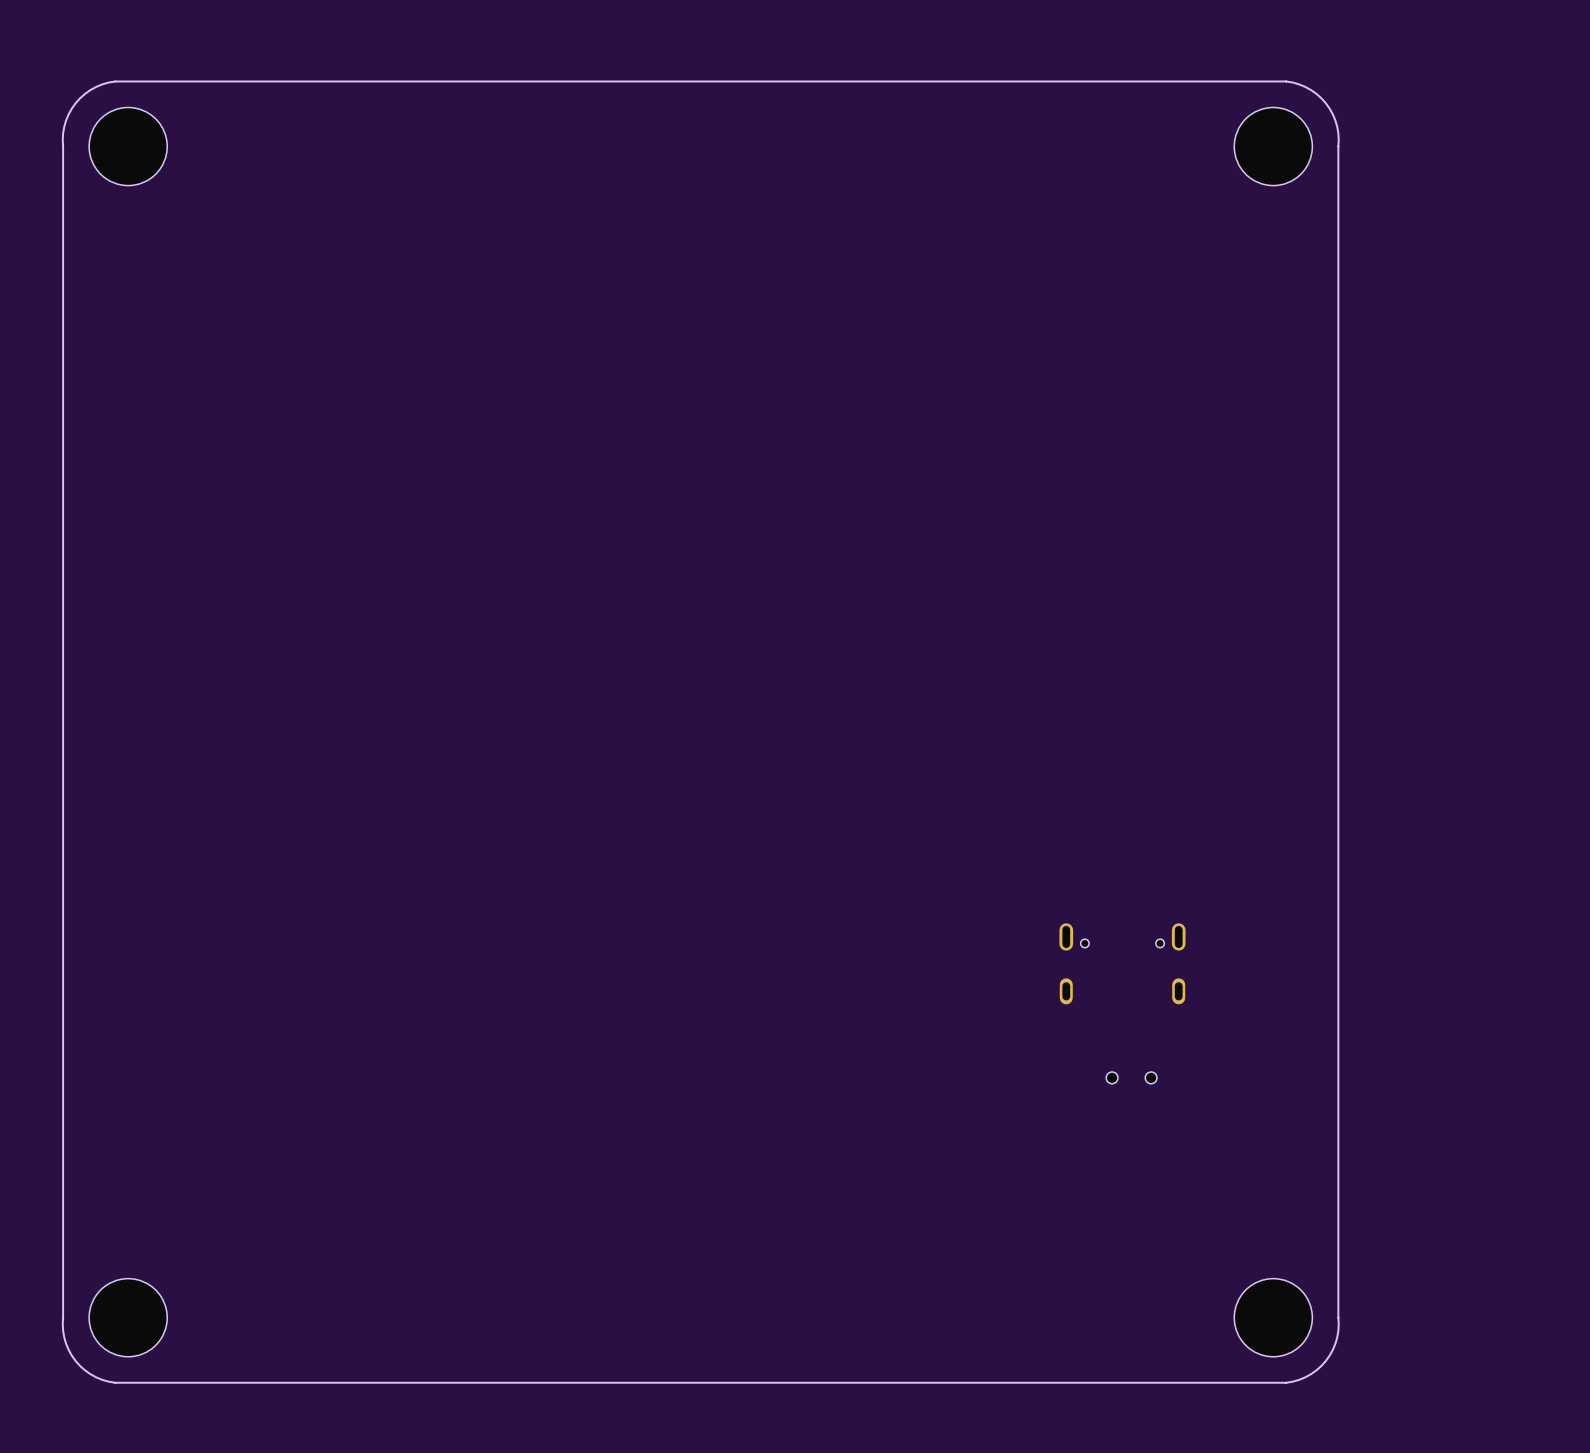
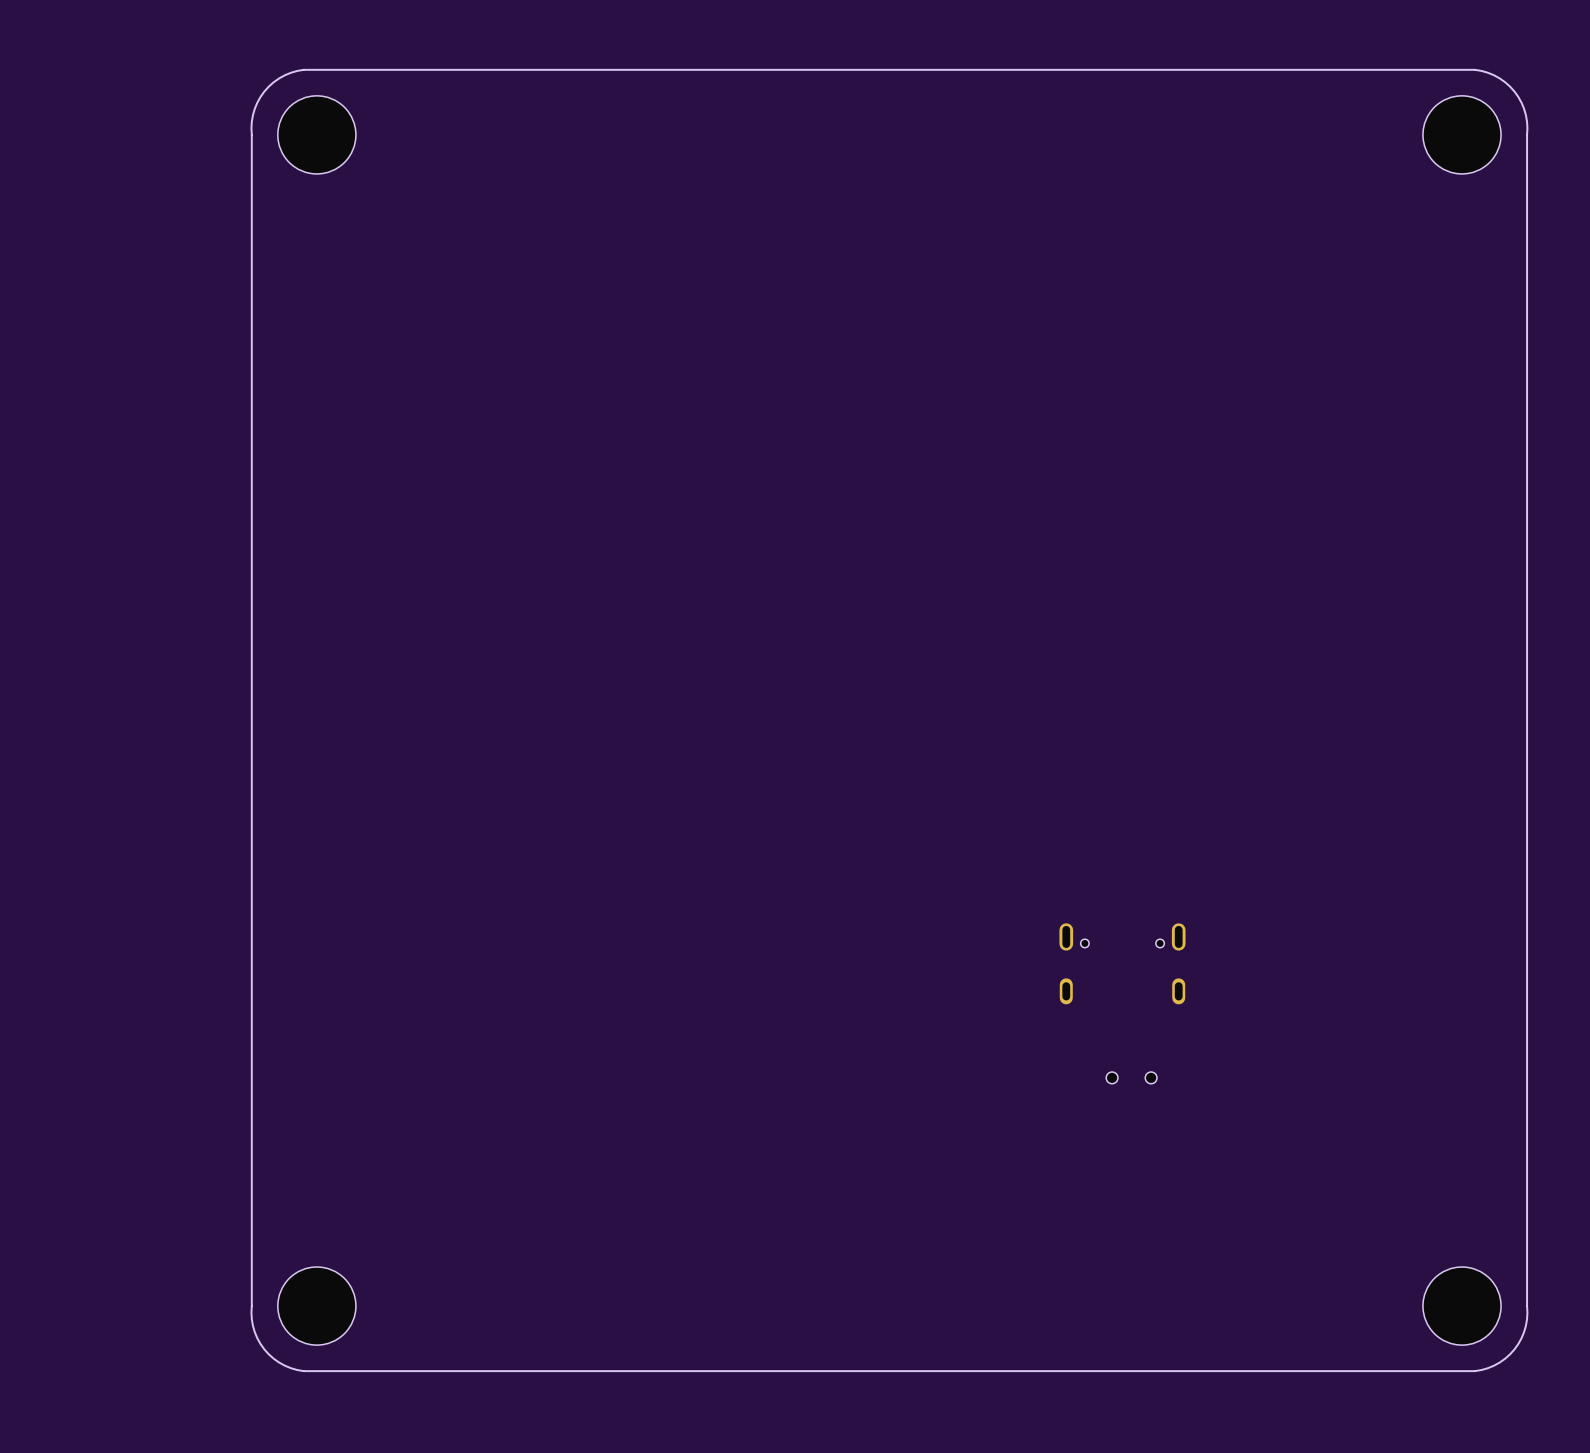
board edge: (1286, 81) (115, 81) (96, 86) (80, 98) (68, 114) (62, 139) (62, 1324) (68, 1349) (80, 1365) (96, 1377) (115, 1382) (1286, 1382) (1305, 1377) (1321, 1365) (1332, 1349) (1338, 1324) (1338, 139) (1332, 114) (1321, 98) (1305, 86) (1286, 81) -> (1475, 69) (303, 69) (284, 75) (268, 86) (257, 102) (251, 128) (251, 1312) (254, 1332) (268, 1354) (284, 1365) (303, 1371) (1475, 1371) (1493, 1365) (1510, 1354) (1521, 1338) (1527, 1312) (1527, 128) (1524, 108) (1514, 91) (1499, 78) (1475, 69)
part position: (128, 146) -> (316, 134)
part position: (1273, 146) -> (1462, 134)
part position: (128, 1317) -> (316, 1306)
part position: (1273, 1317) -> (1462, 1306)

